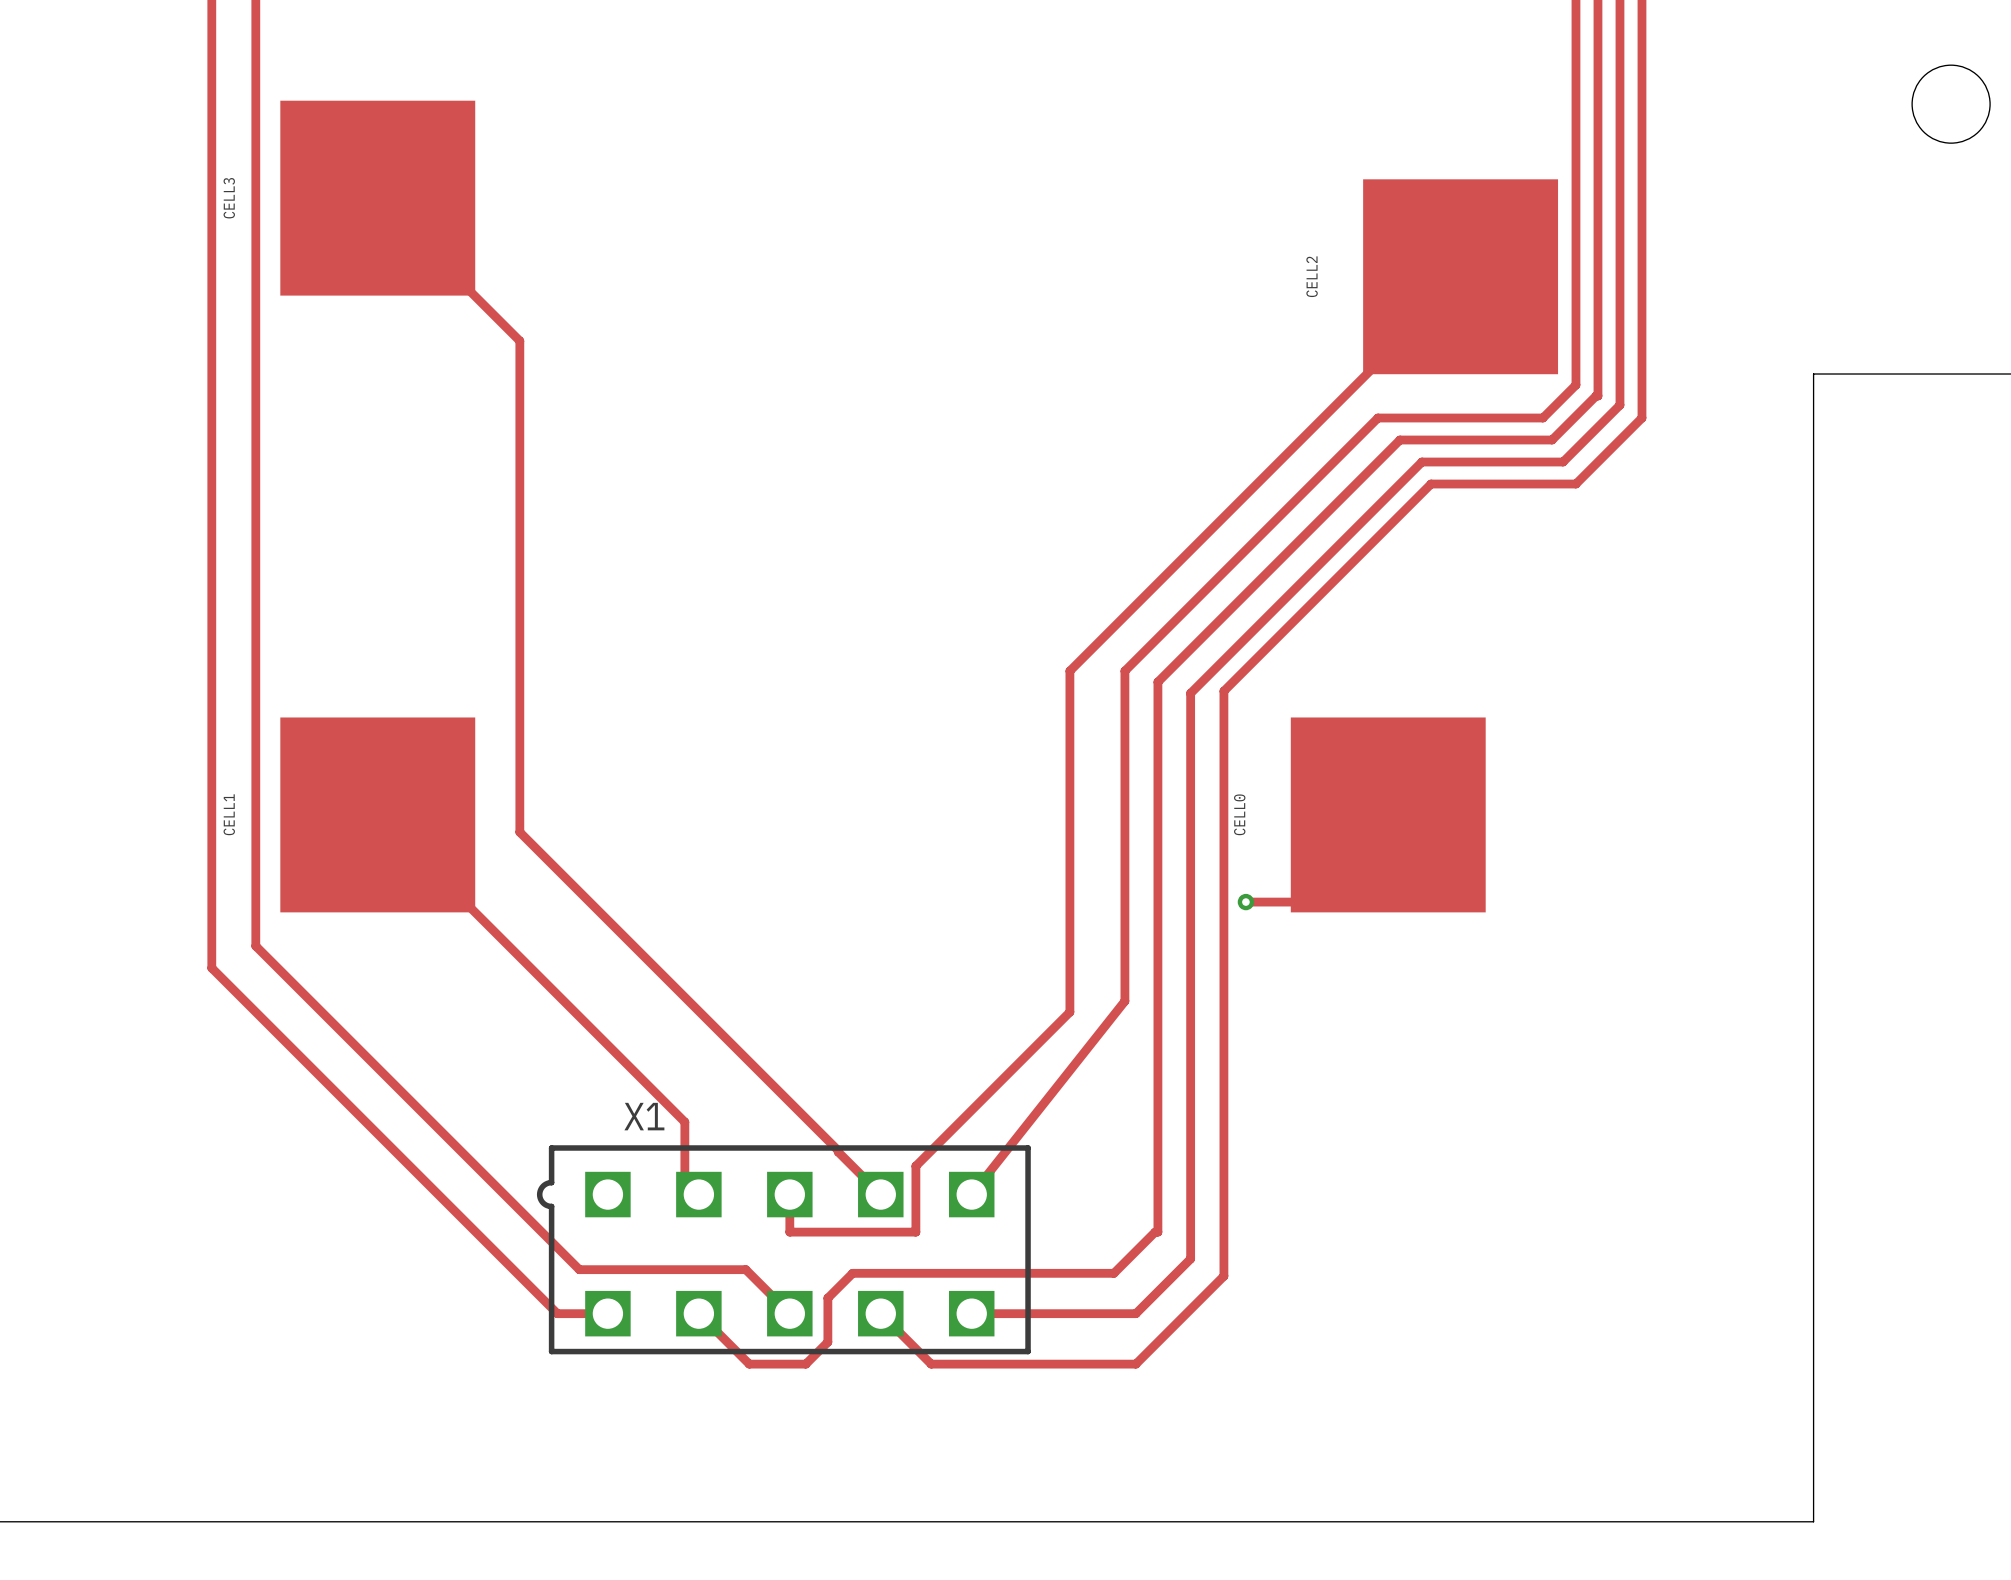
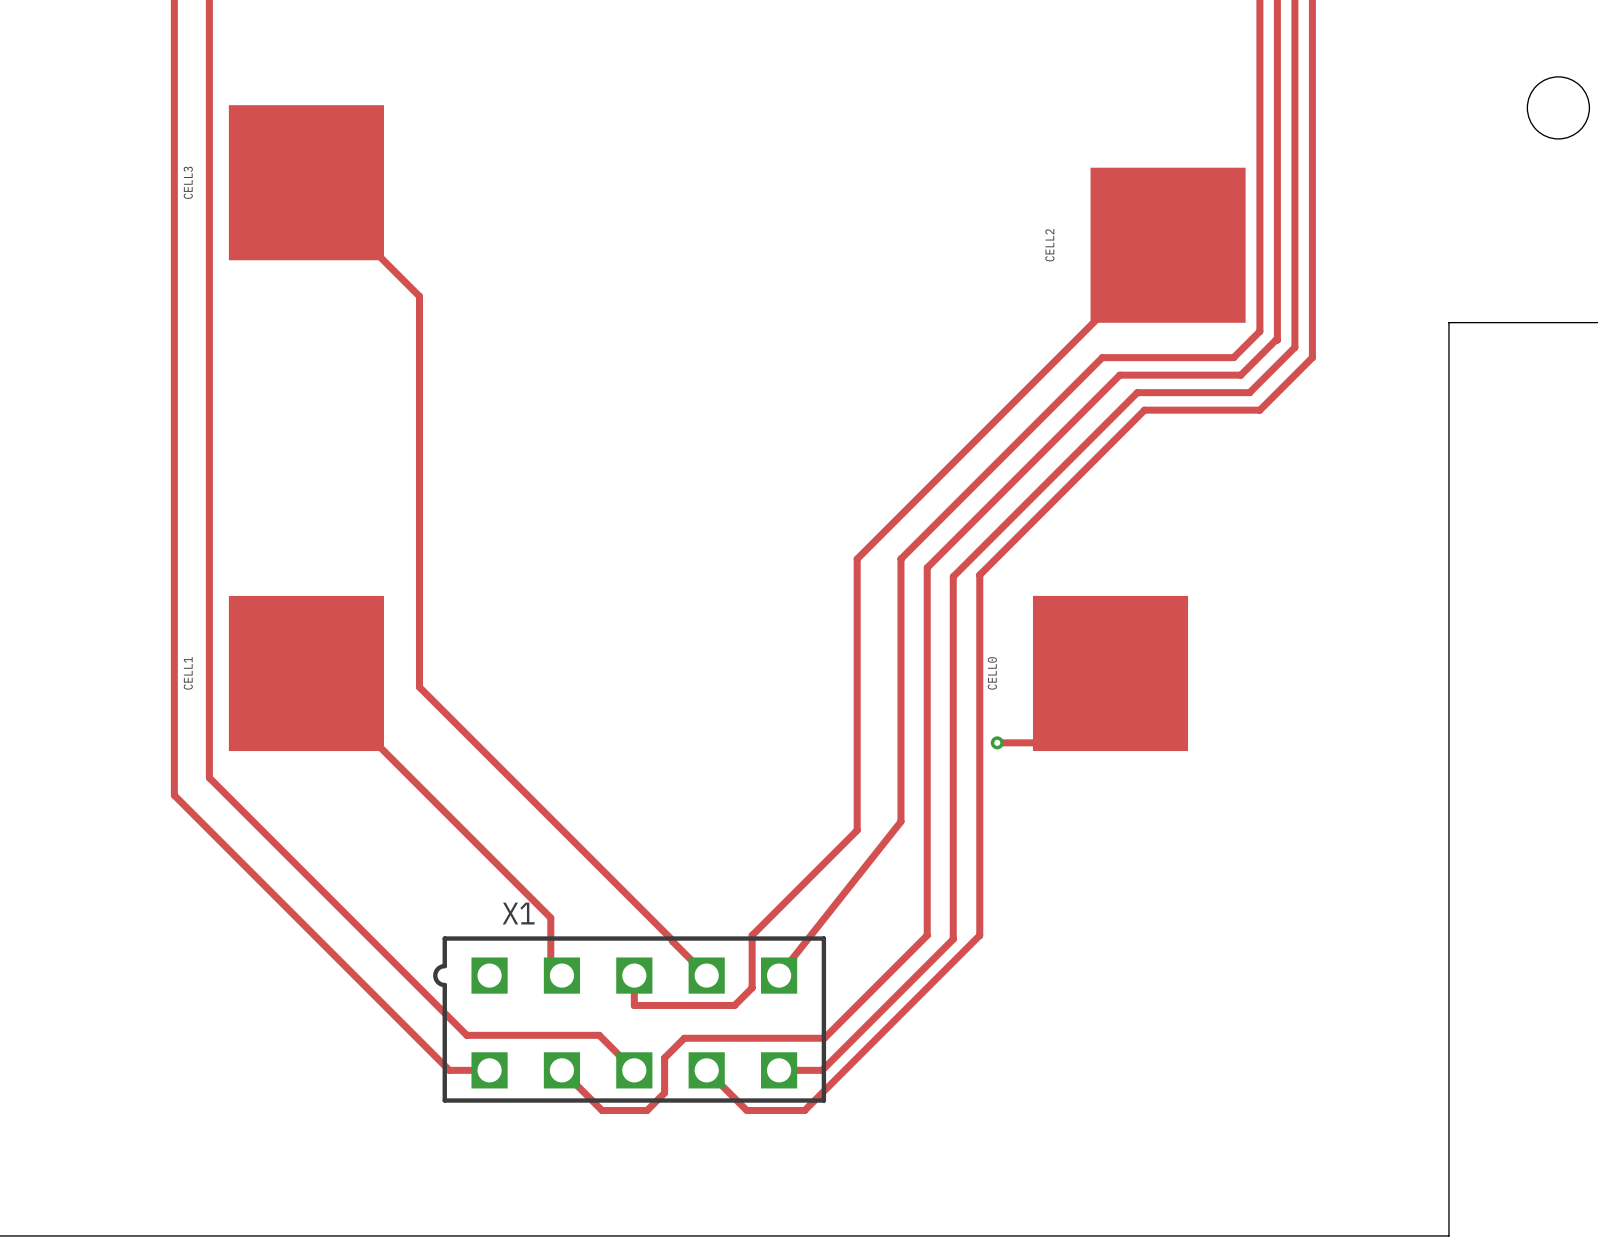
track: (937, 1144) (915, 1166) (915, 1232) -> (752, 935) (752, 987) (734, 1005)
track: (1157, 1144) (1157, 1232) (1155, 1232) (1113, 1273) (1028, 1273) -> (927, 935) (824, 1038)
track: (1223, 1144) (1223, 1276) (1135, 1364) (1003, 1364) -> (979, 935) (804, 1110)
track: (1190, 1148) (1190, 1258) (1135, 1313) (1025, 1313) -> (953, 939) (822, 1070)

